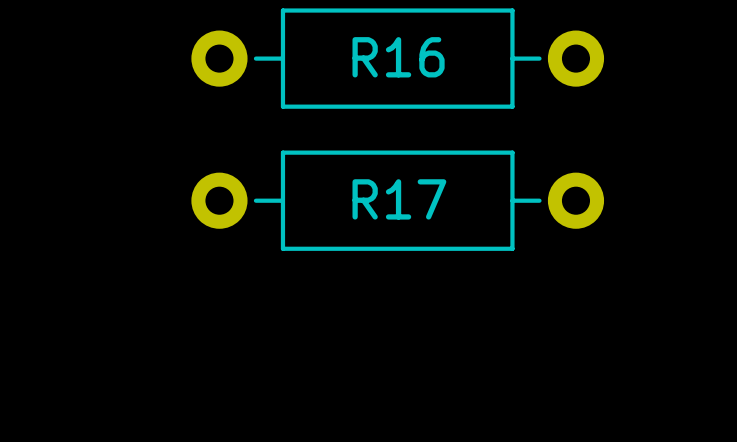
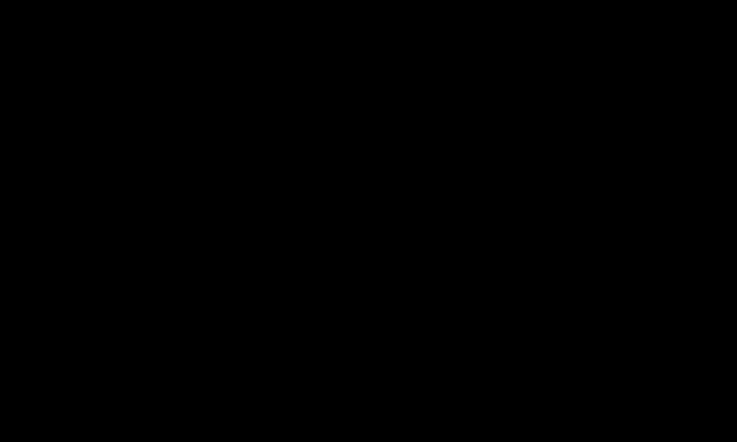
R16: (397, 58) -> none
R17: (397, 200) -> none

